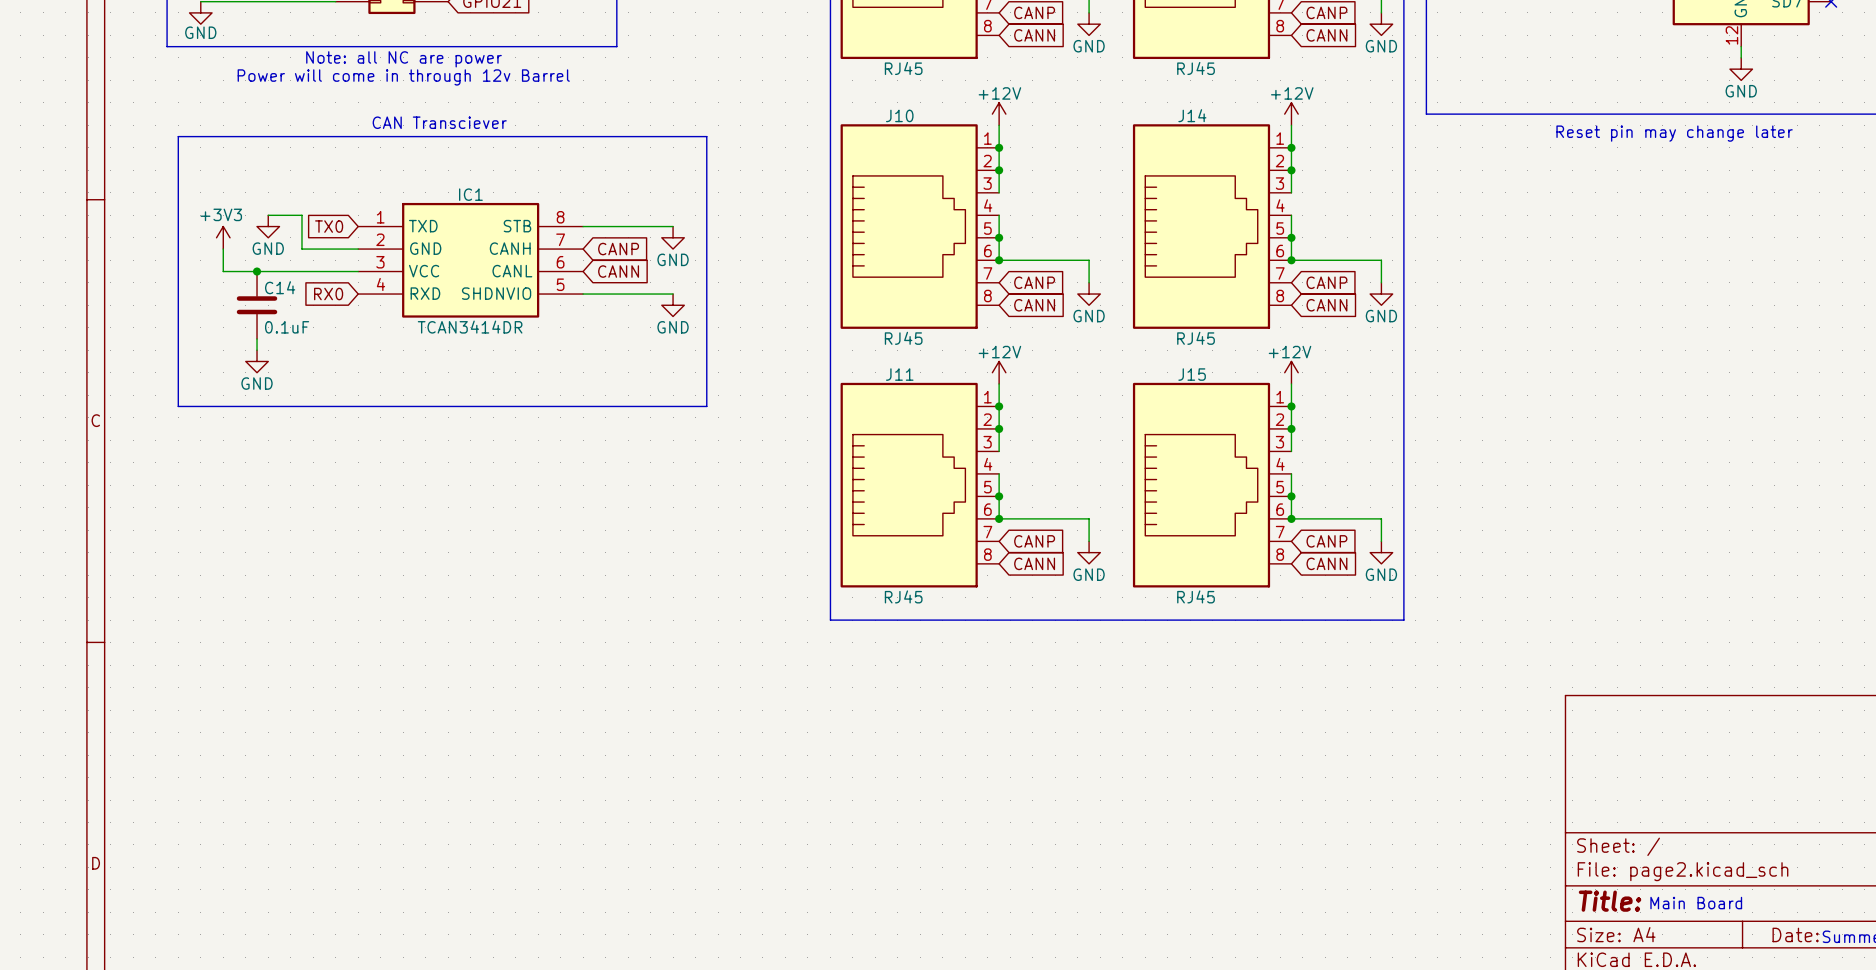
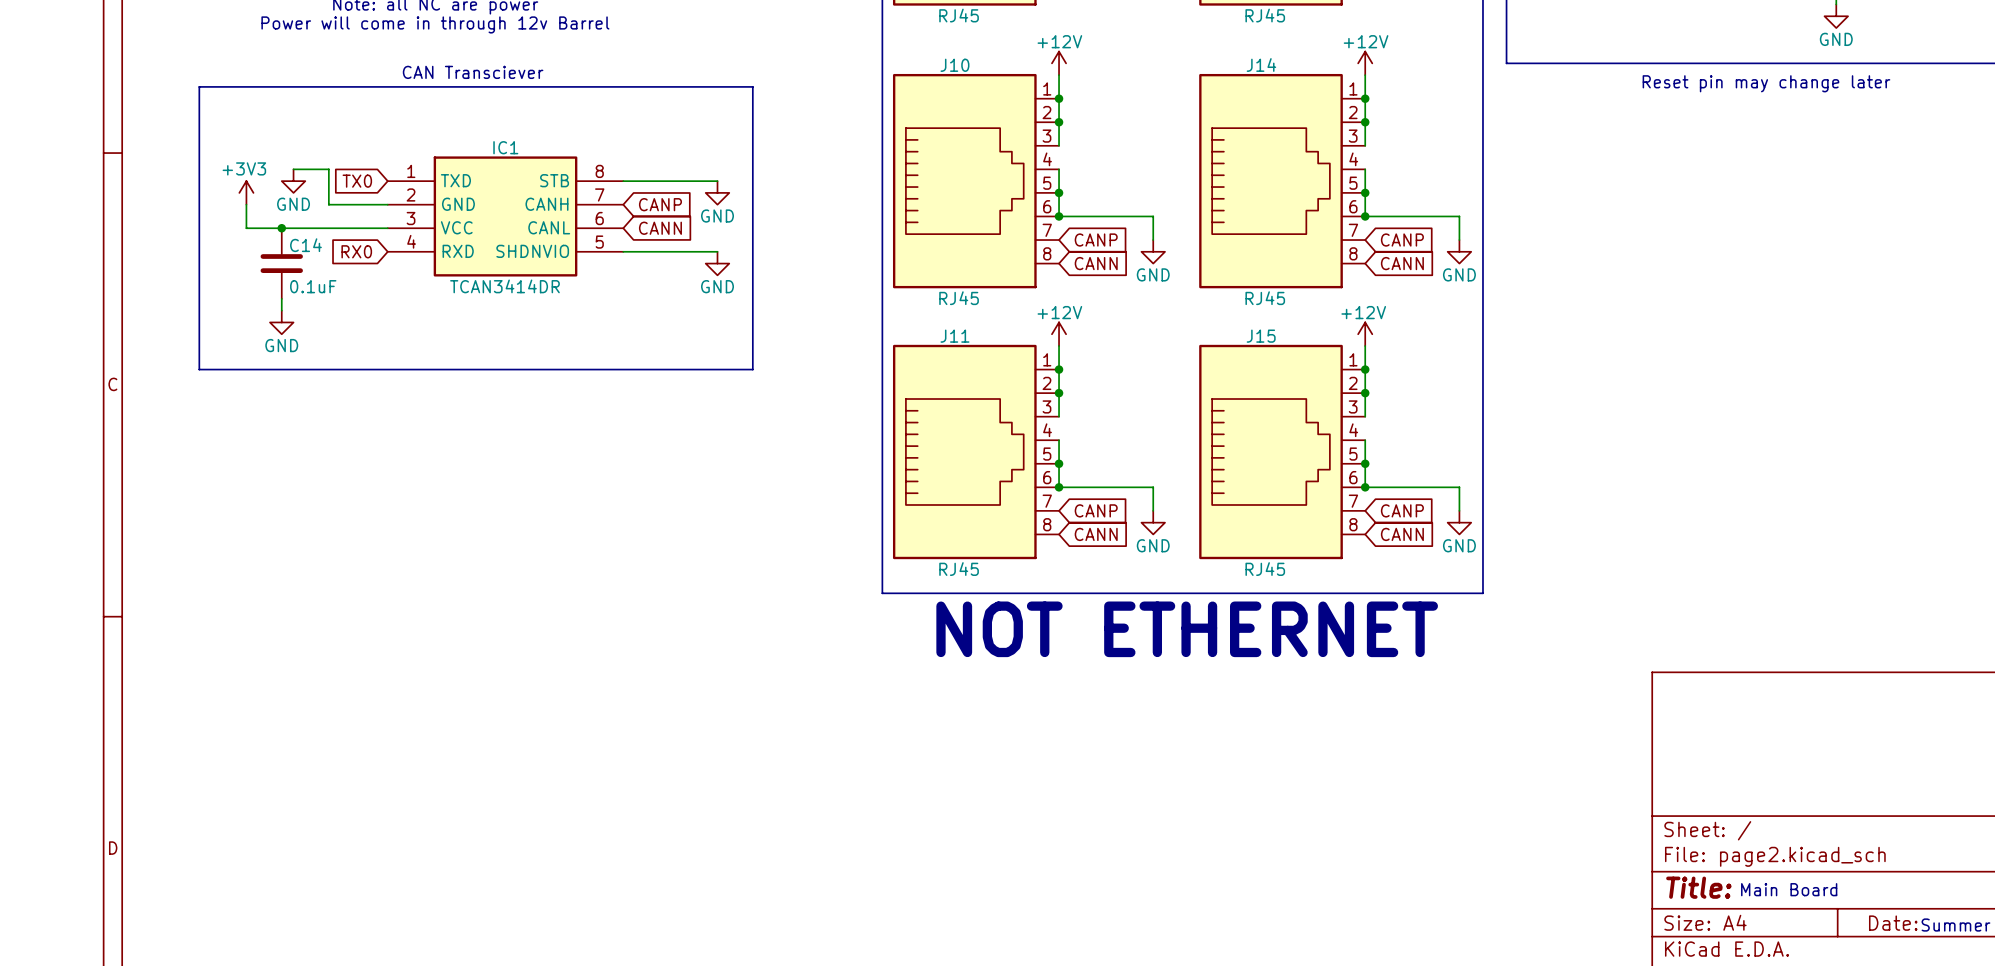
text: none -> NOT ETHERNET (1187, 629)

